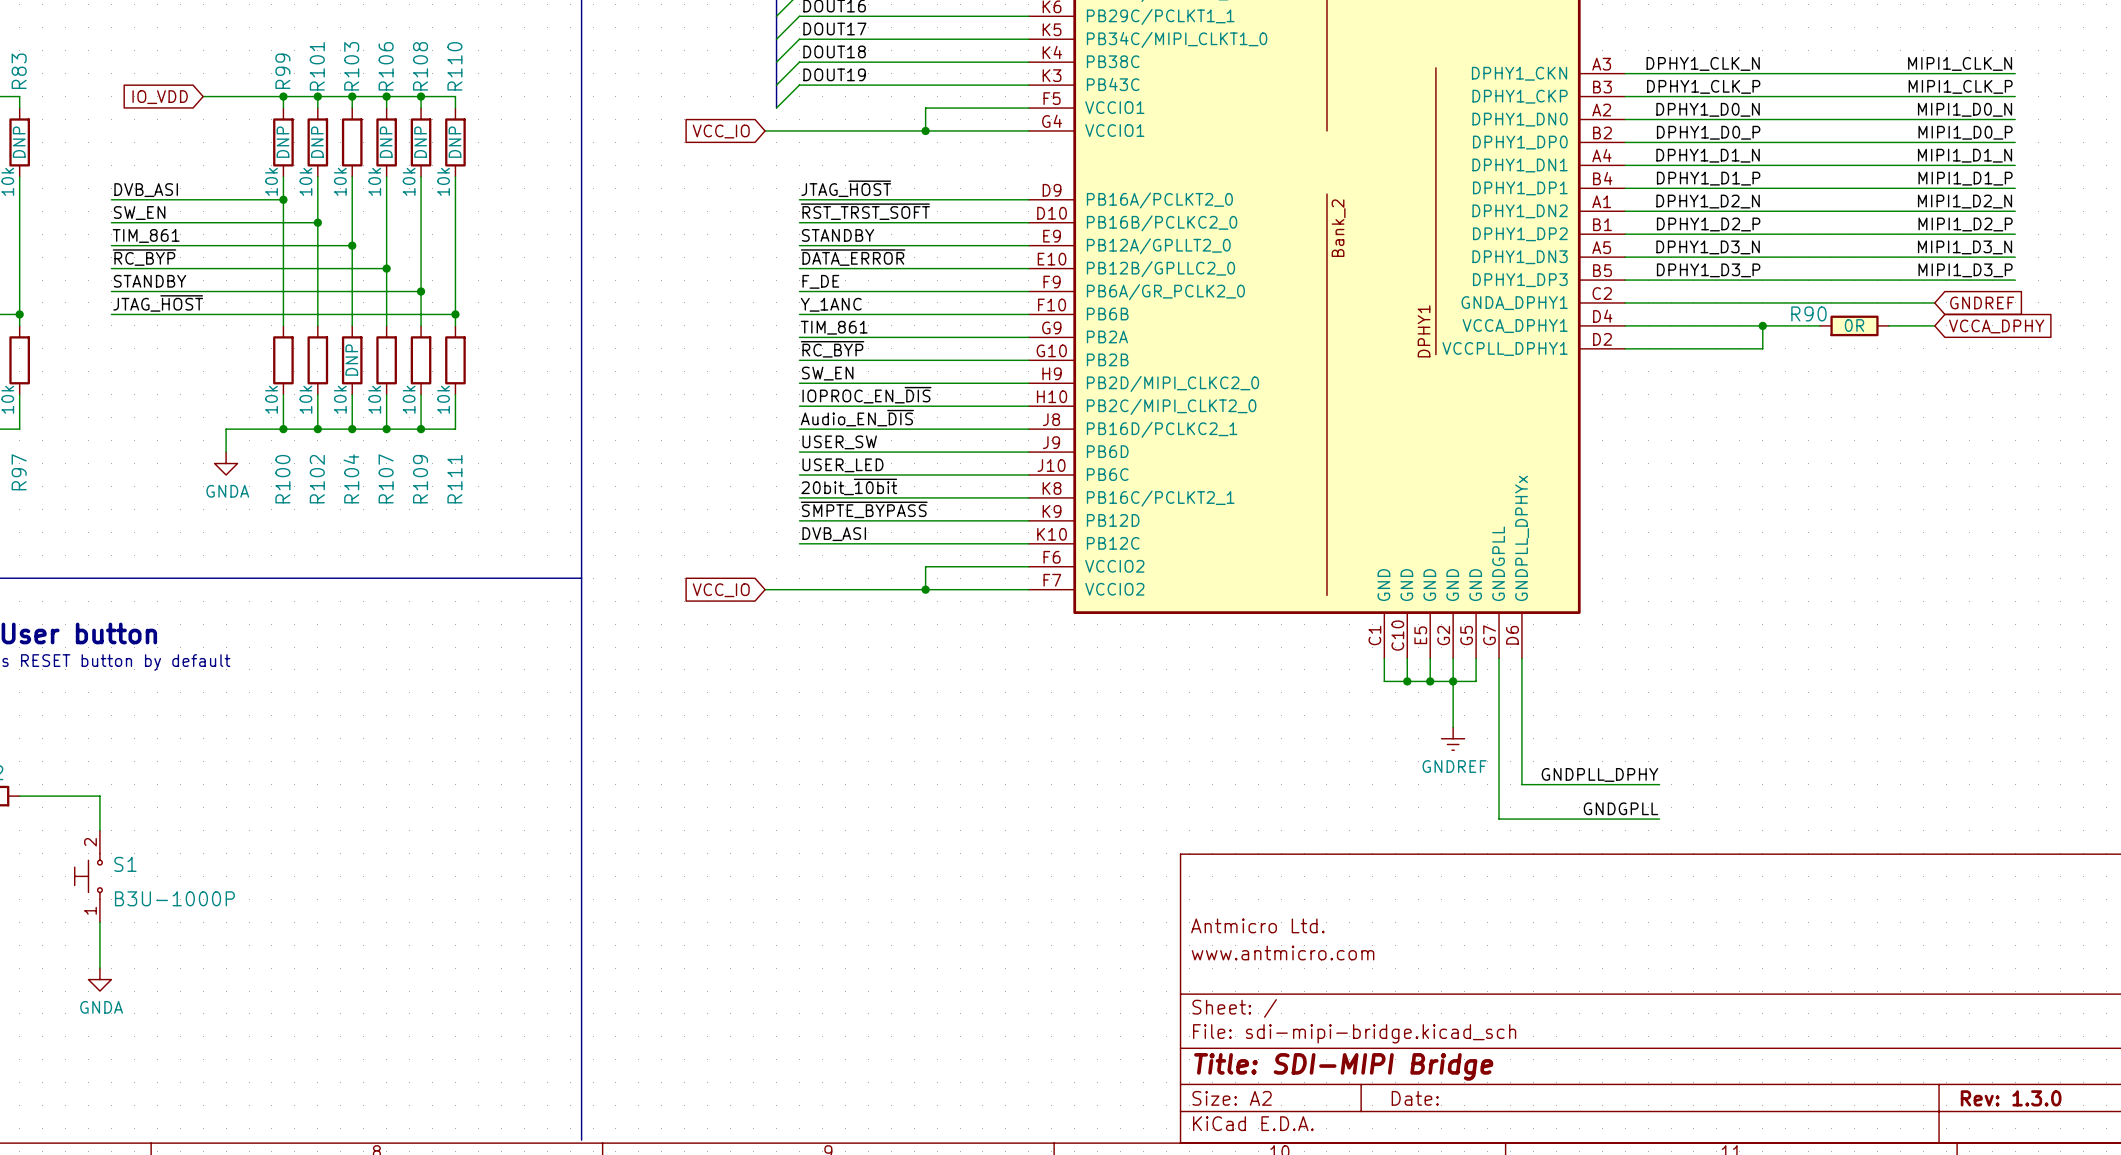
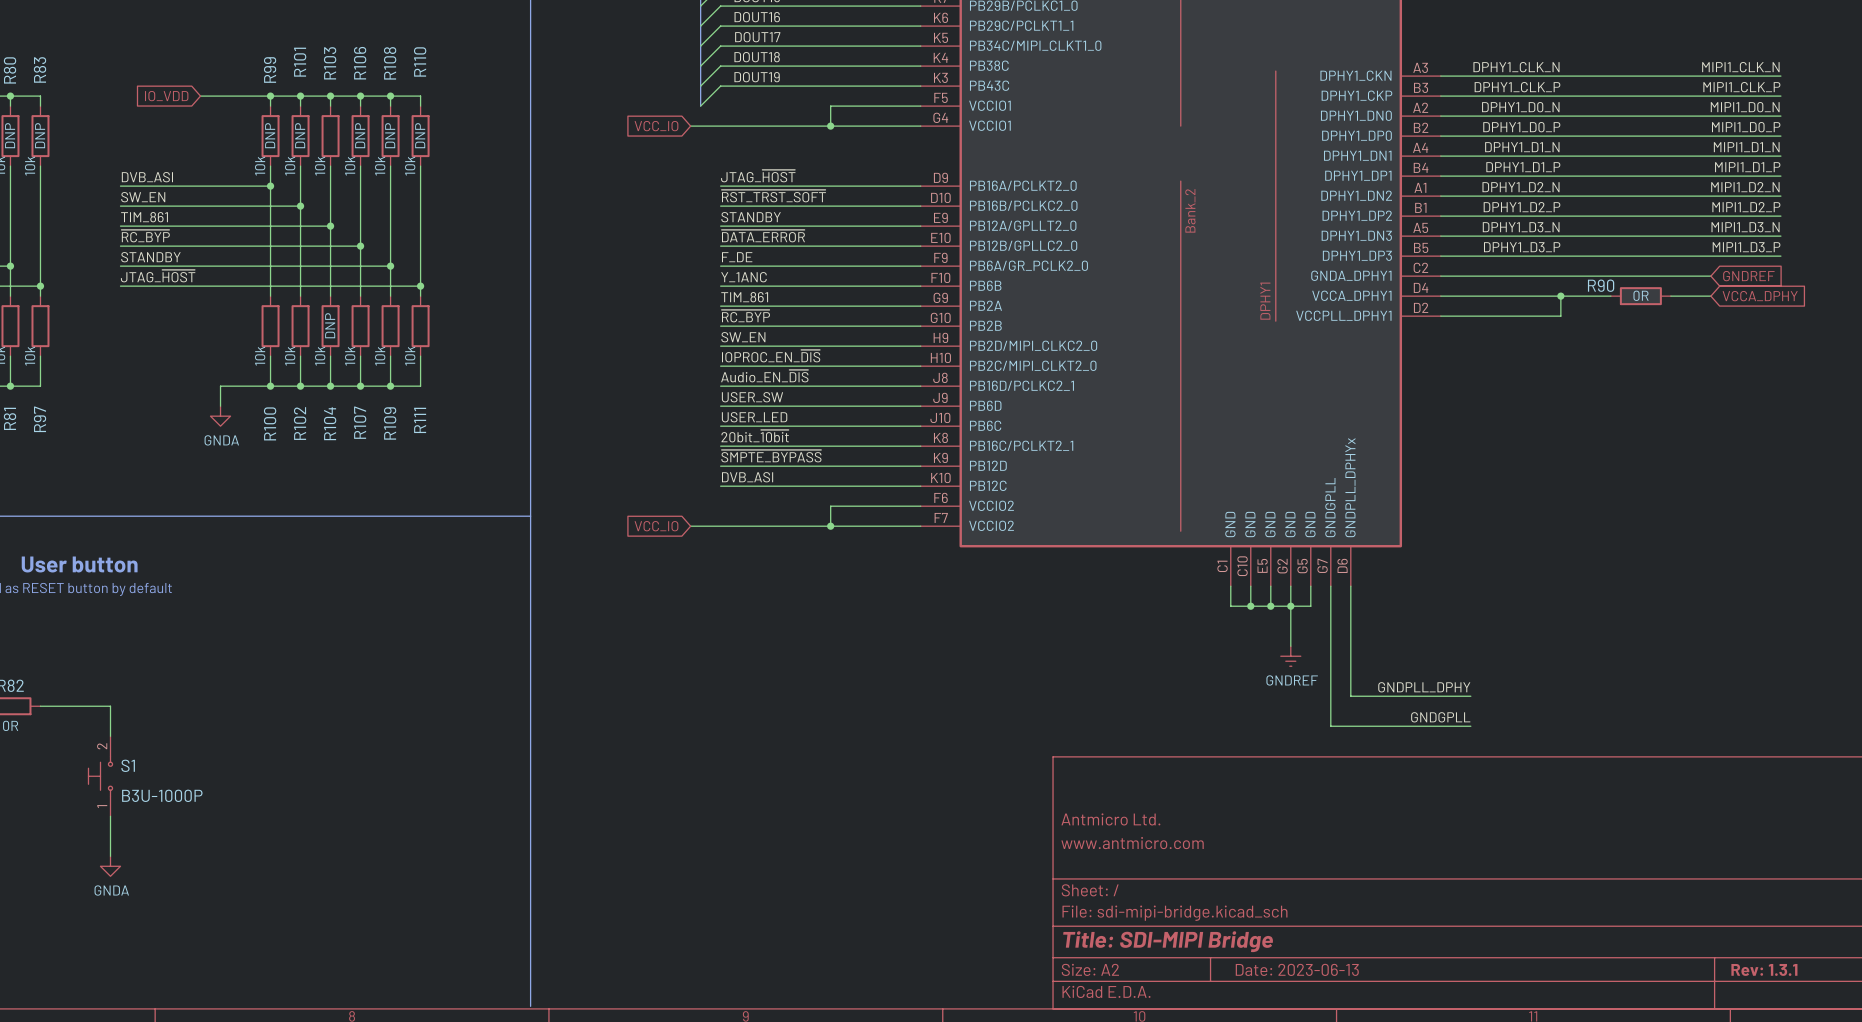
title block: Date: (1415, 1098) -> Date: 2023-06-13 (1297, 969)
title block: Rev: 1.3.0 (2011, 1098) -> Rev: 1.3.1 (1764, 969)

